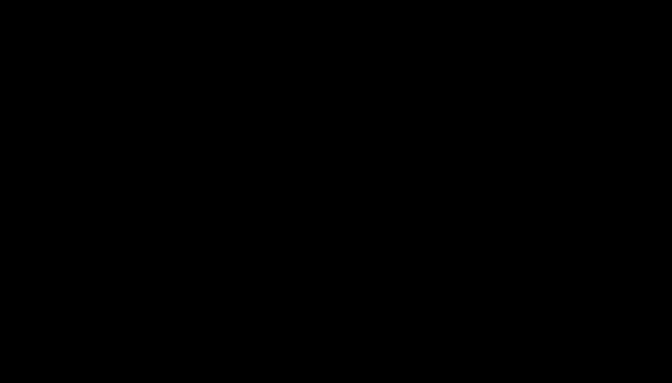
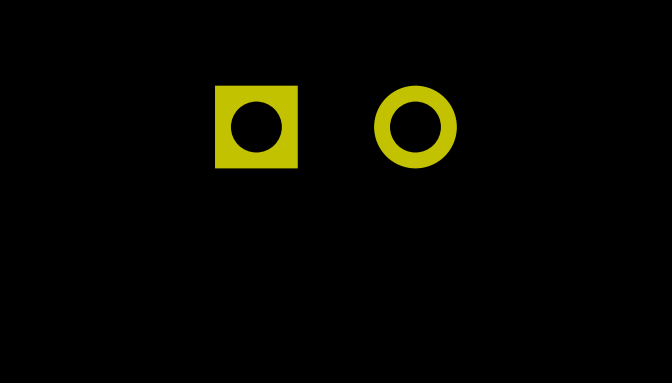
part: none -> (335, 127)

